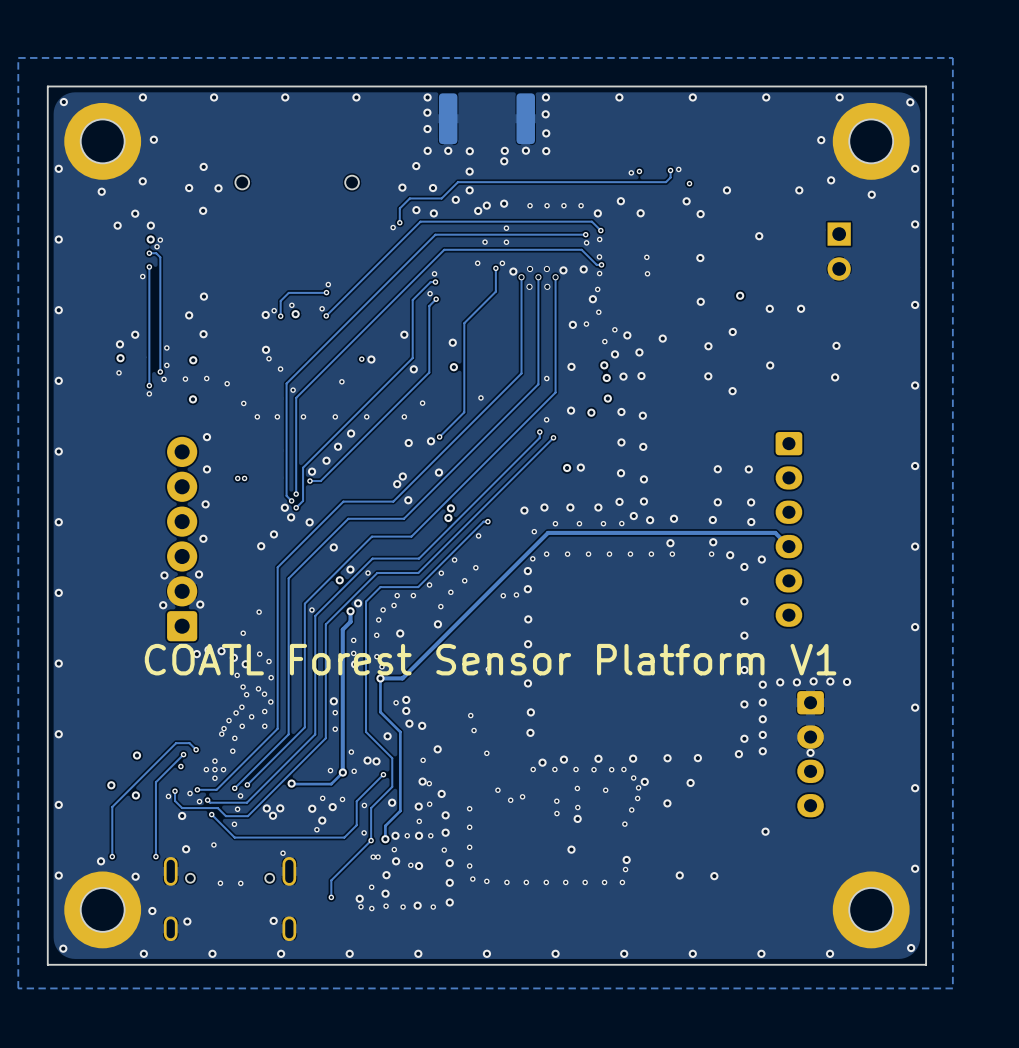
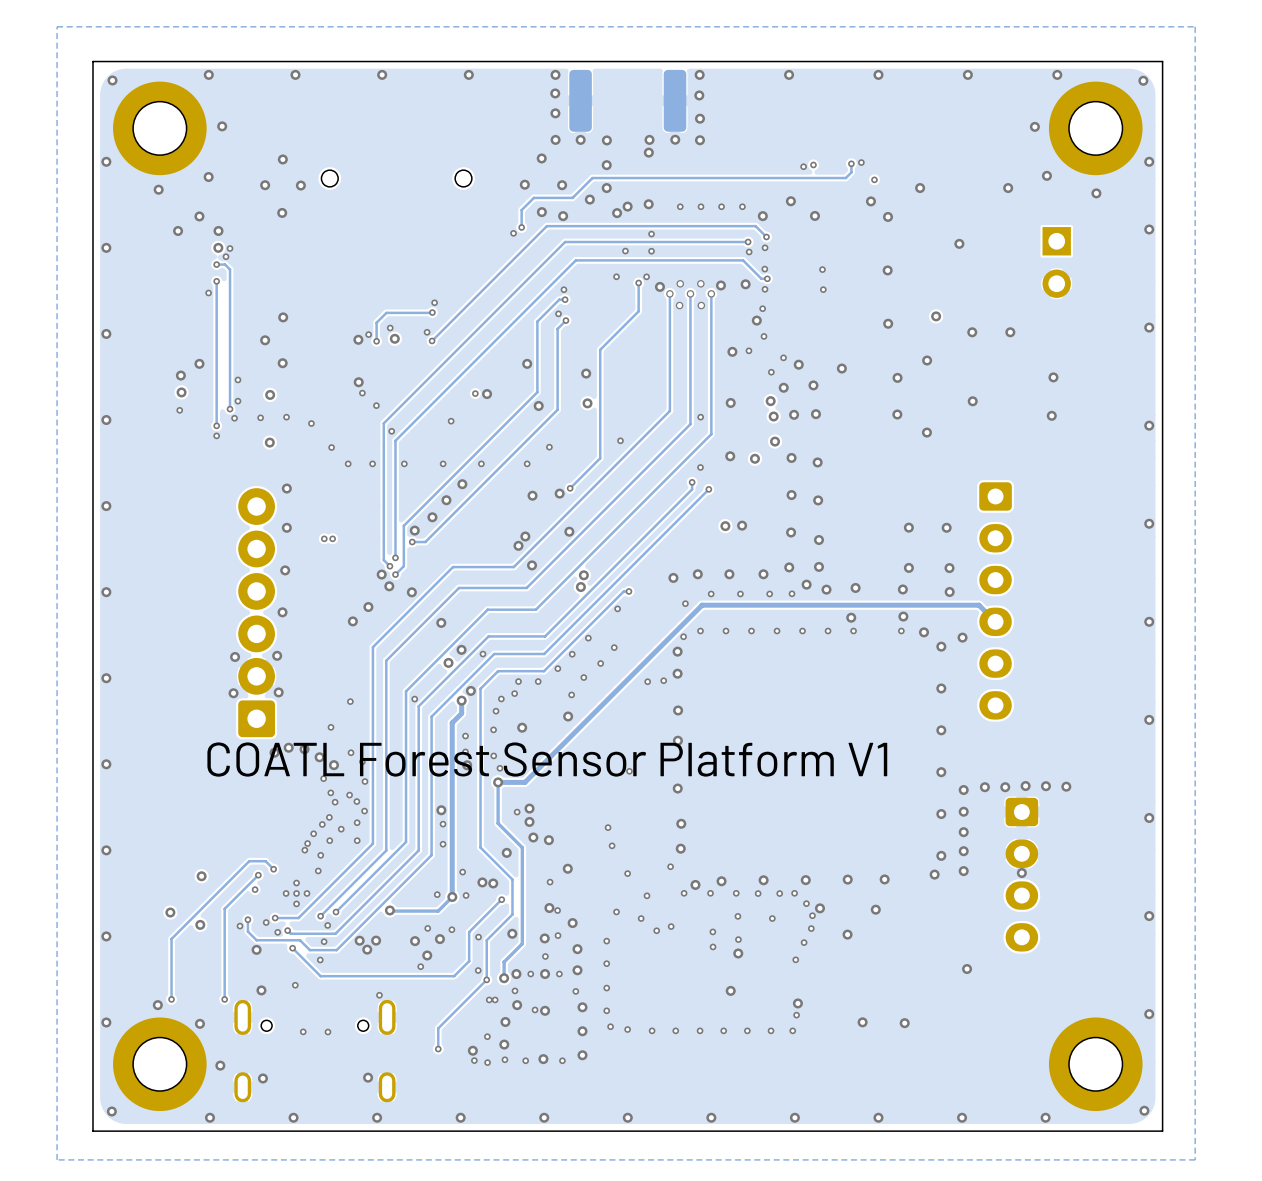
via: none -> (670, 866)
via: none -> (647, 895)
via: none -> (616, 911)

